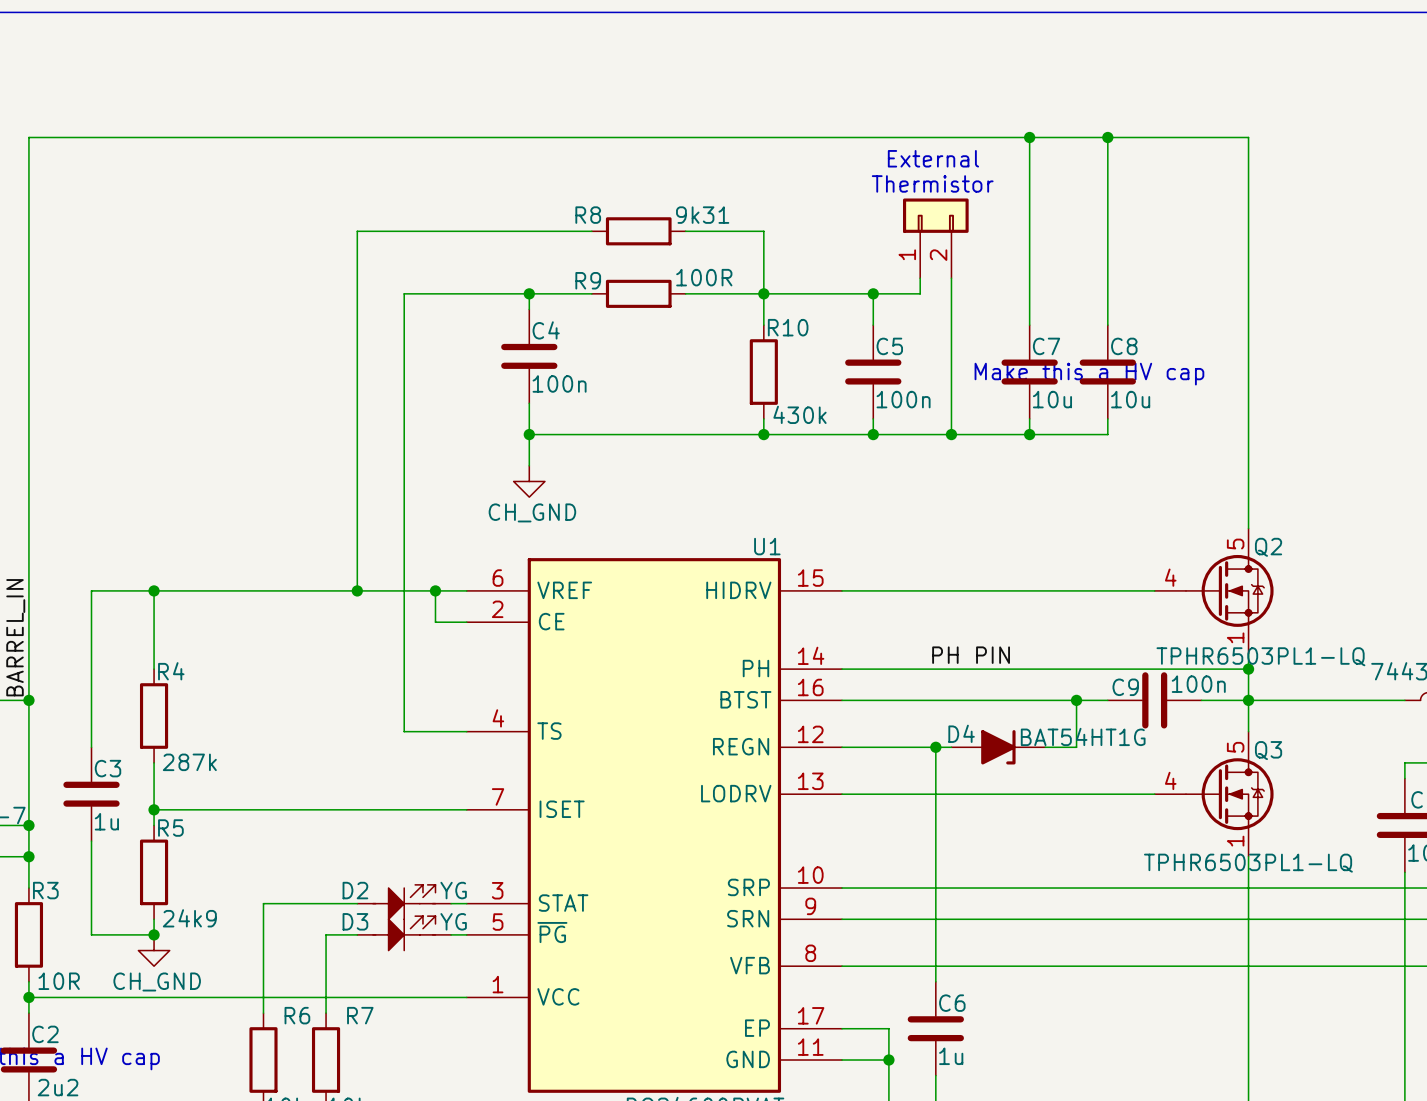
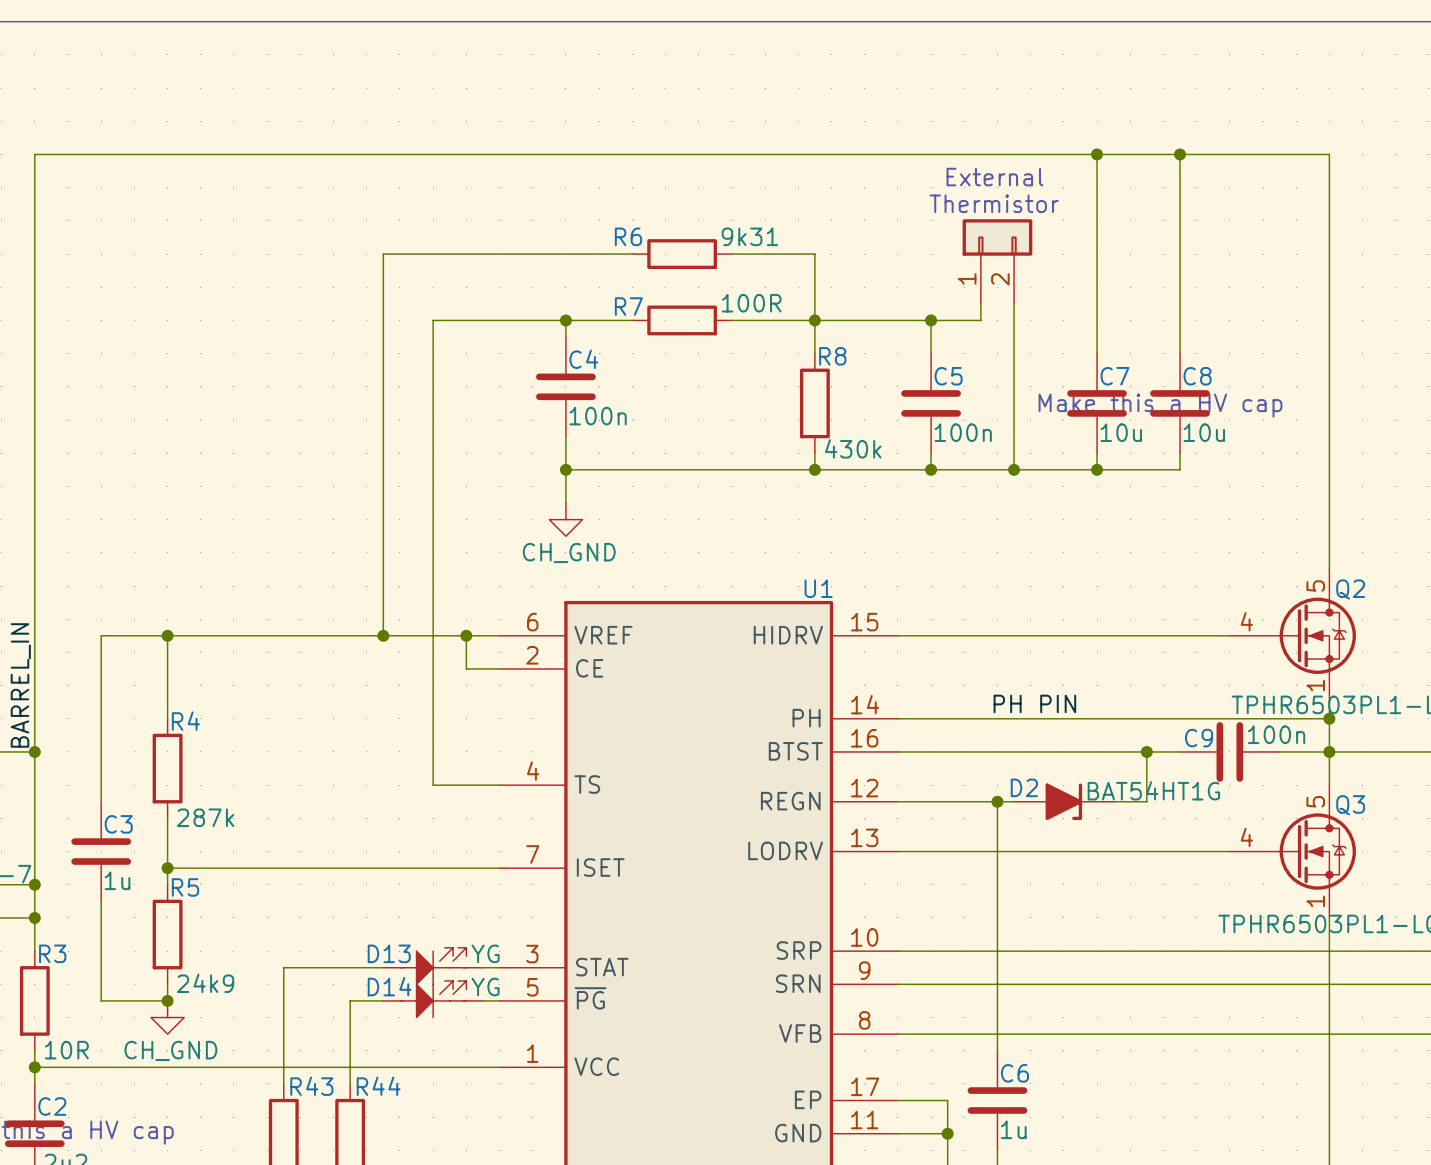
R8 name: R8 (588, 215) -> R6 (628, 236)
R9 name: R9 (588, 280) -> R7 (628, 306)
R10 name: R10 (788, 327) -> R8 (832, 356)
D4 name: D4 (961, 733) -> D2 (1024, 787)
D2 name: D2 (355, 890) -> D13 (389, 953)
D3 name: D3 (355, 921) -> D14 (389, 986)
R6 name: R6 (297, 1015) -> R43 (311, 1086)
R7 name: R7 (360, 1015) -> R44 (378, 1086)

